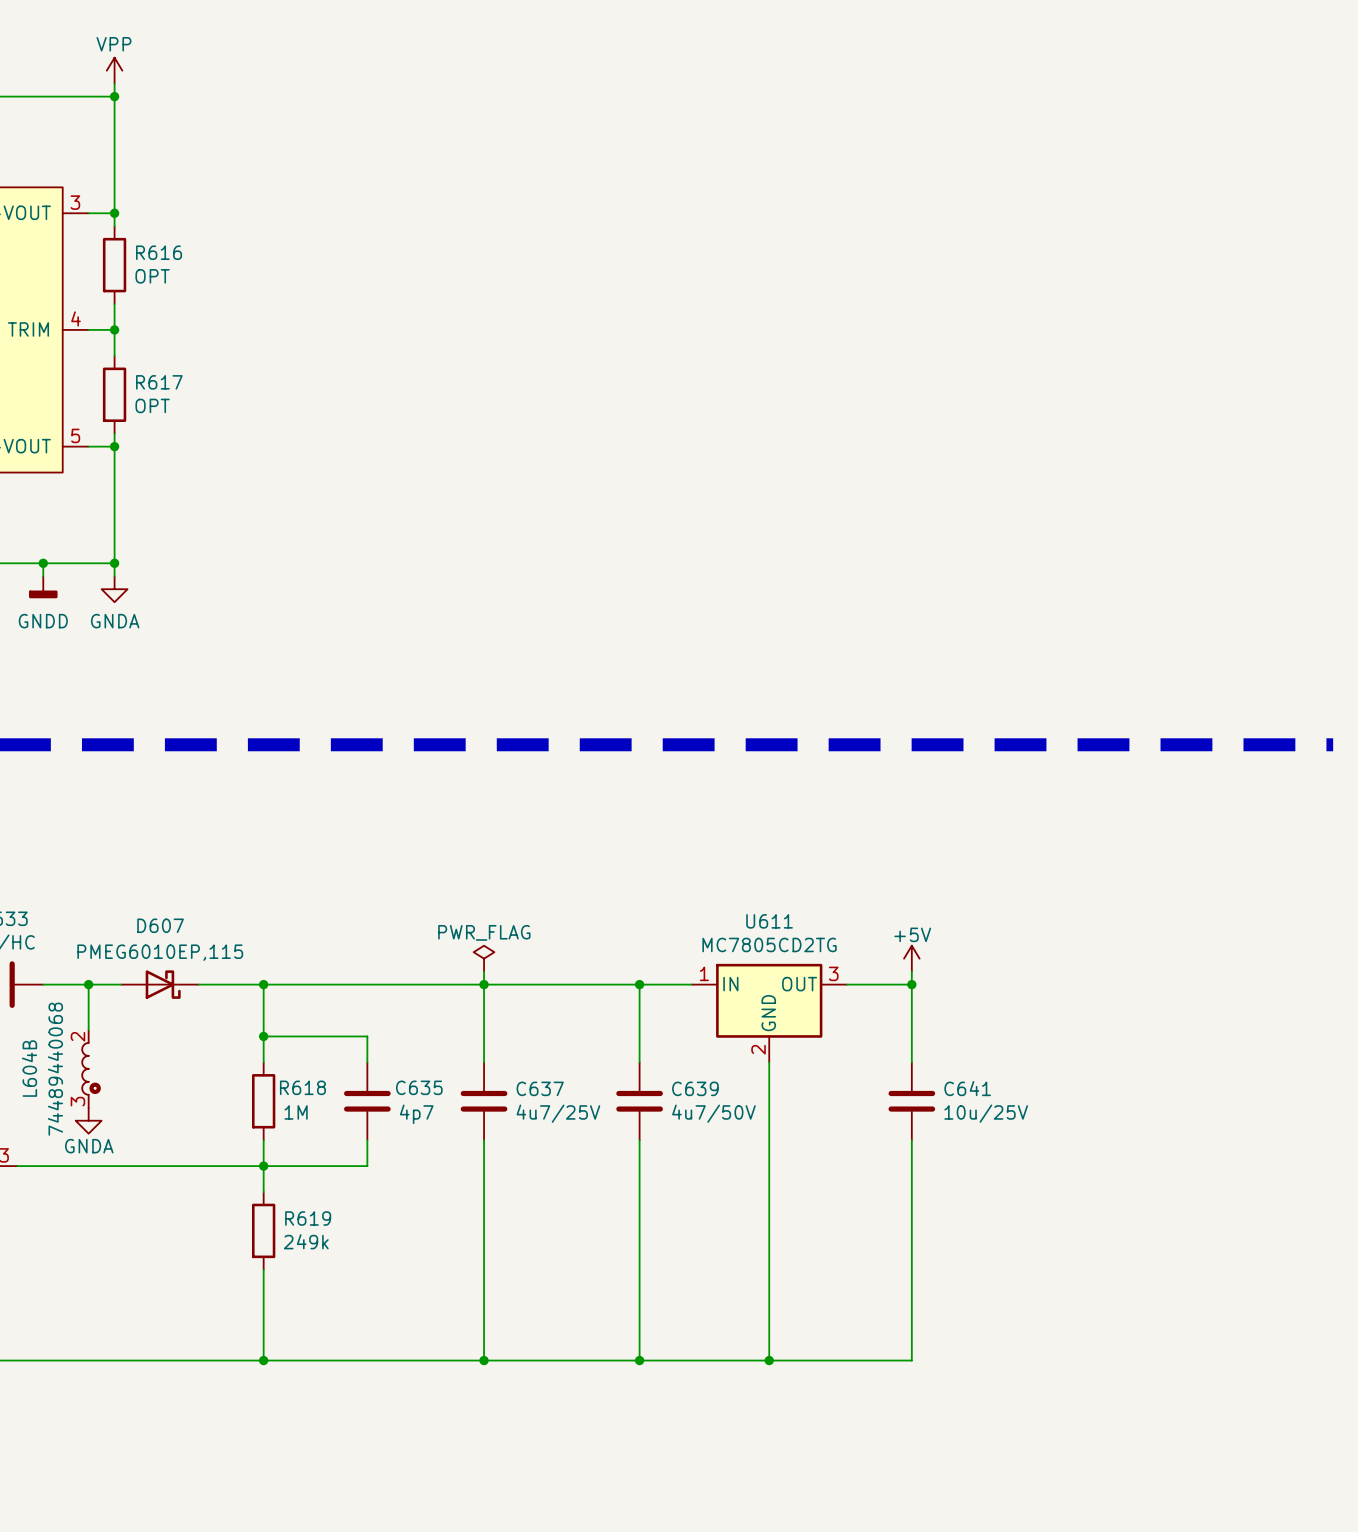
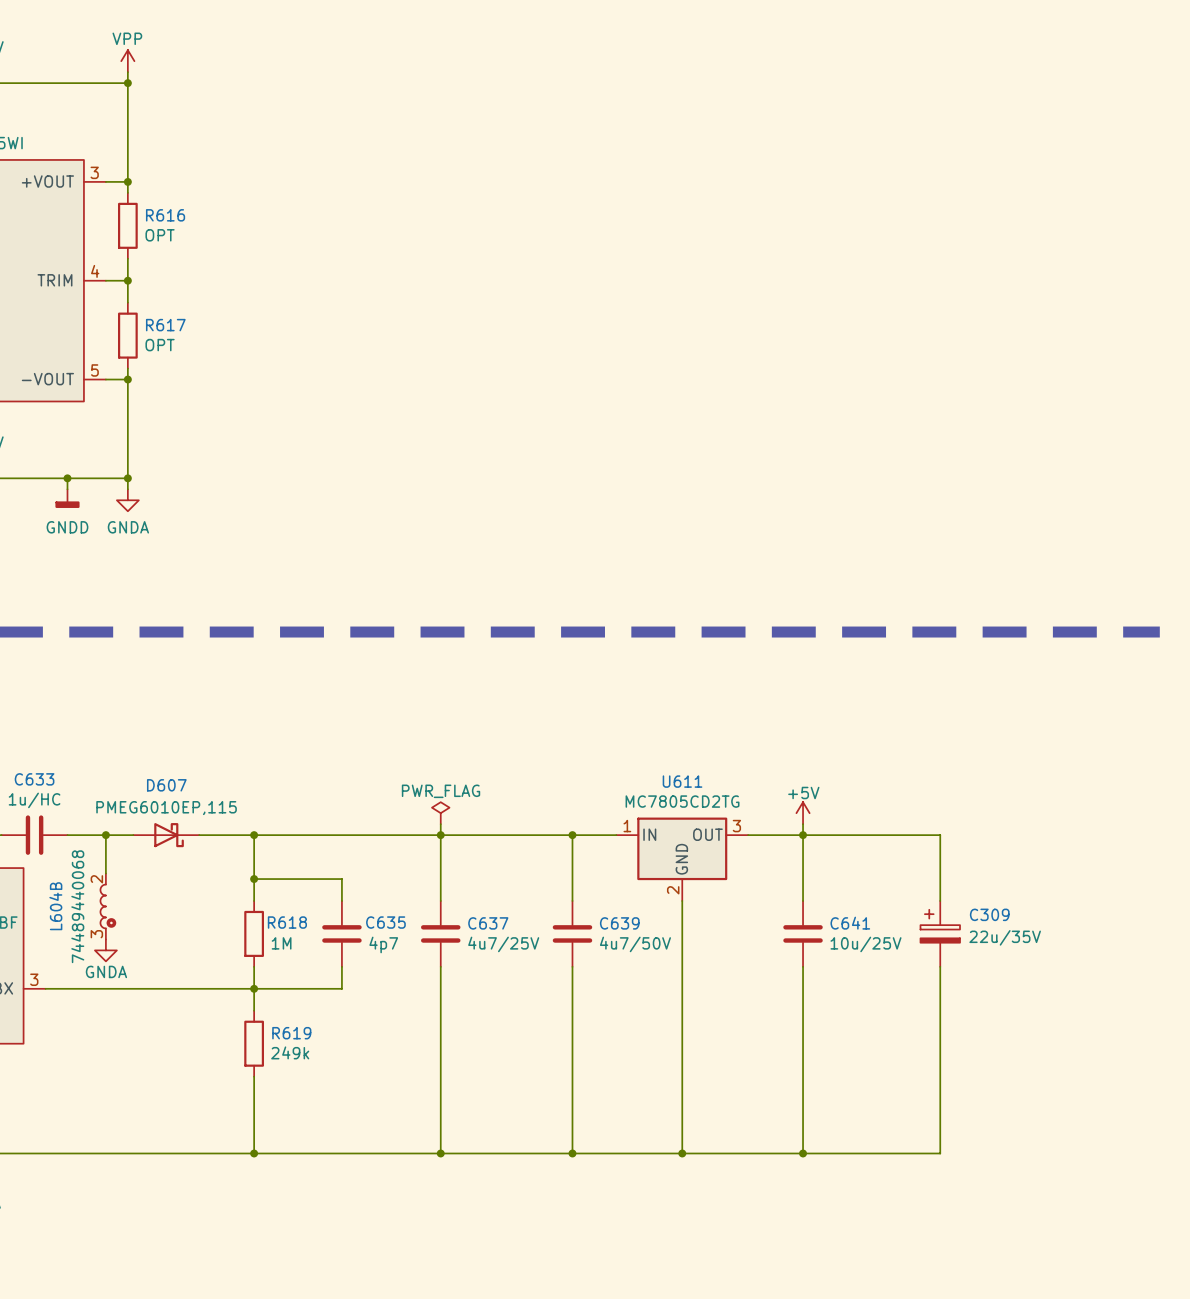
wire: none -> (803, 835) (940, 835) (940, 900)
C309: none -> 22u/35V (940, 933)
wire: none -> (940, 966) (940, 1153) (803, 1153)
junction: none -> (803, 1153)

